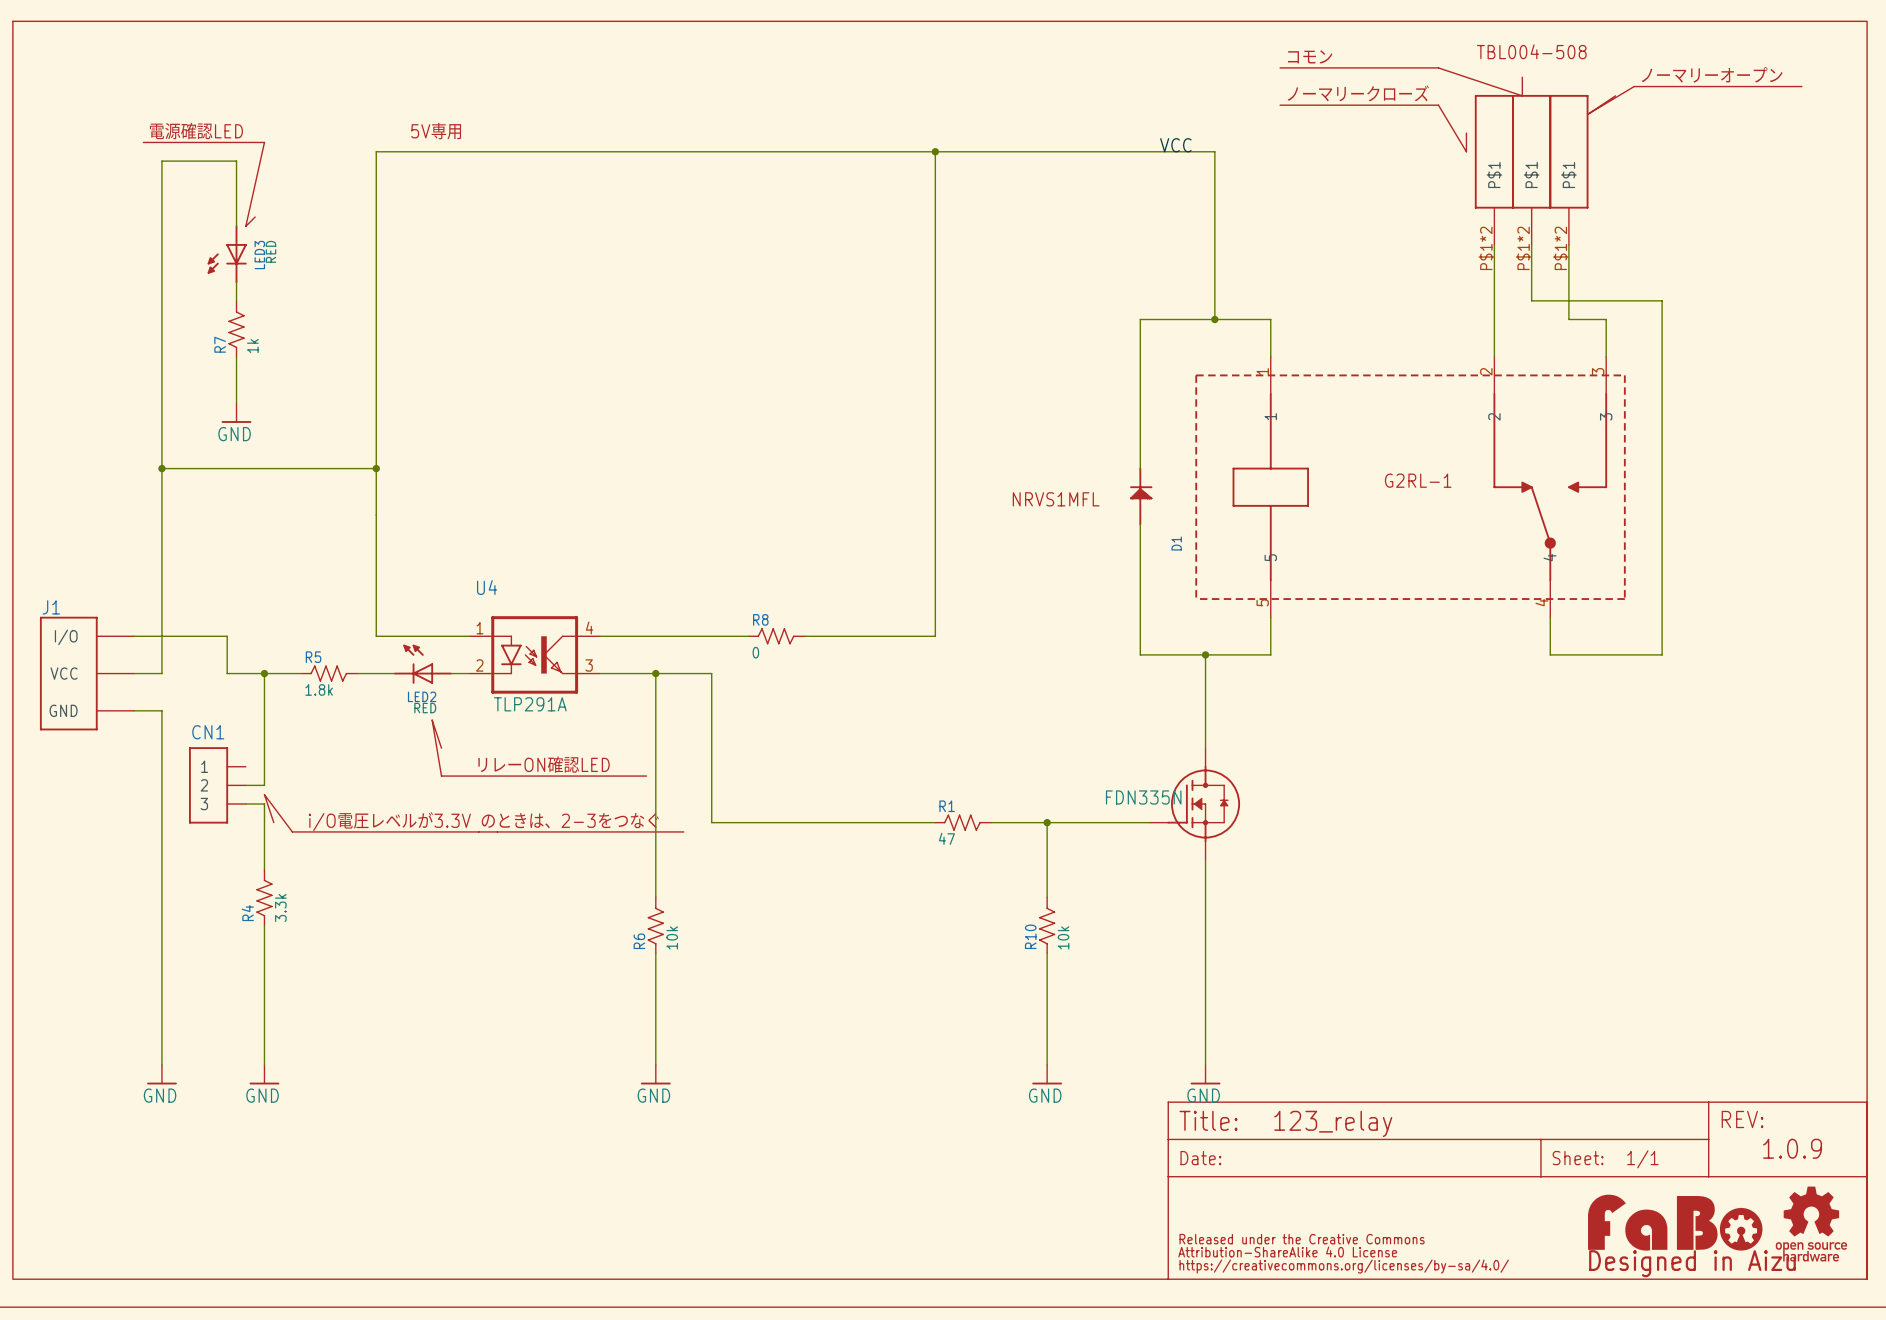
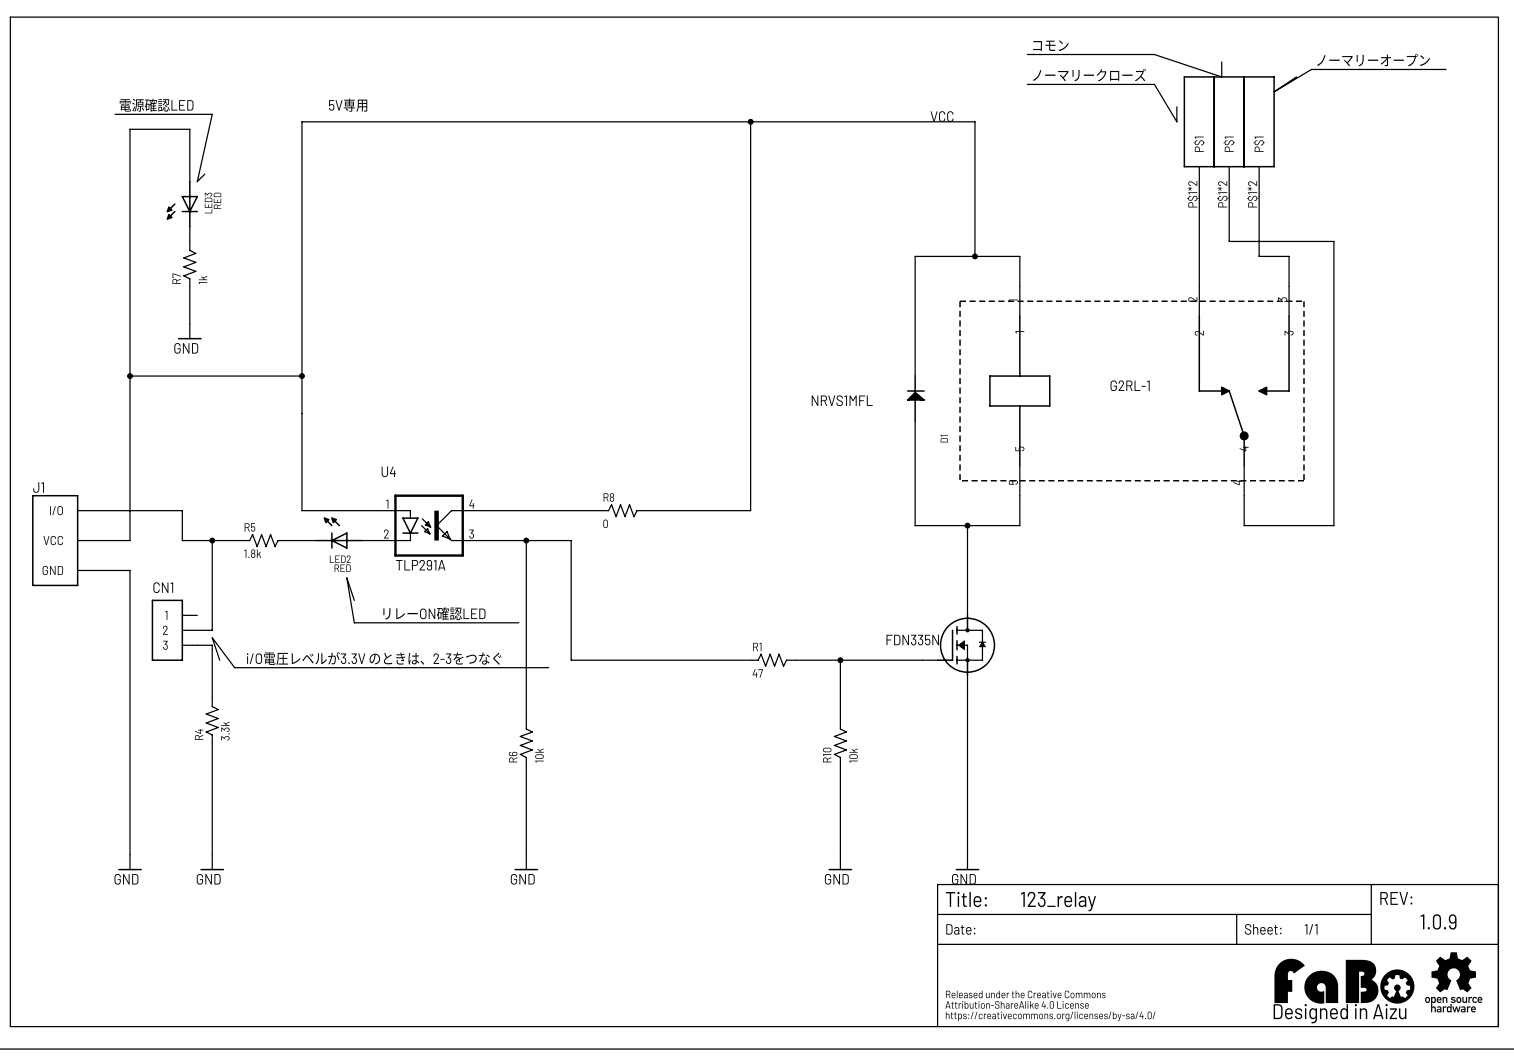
text: TBL004-508 (1531, 51) -> none

